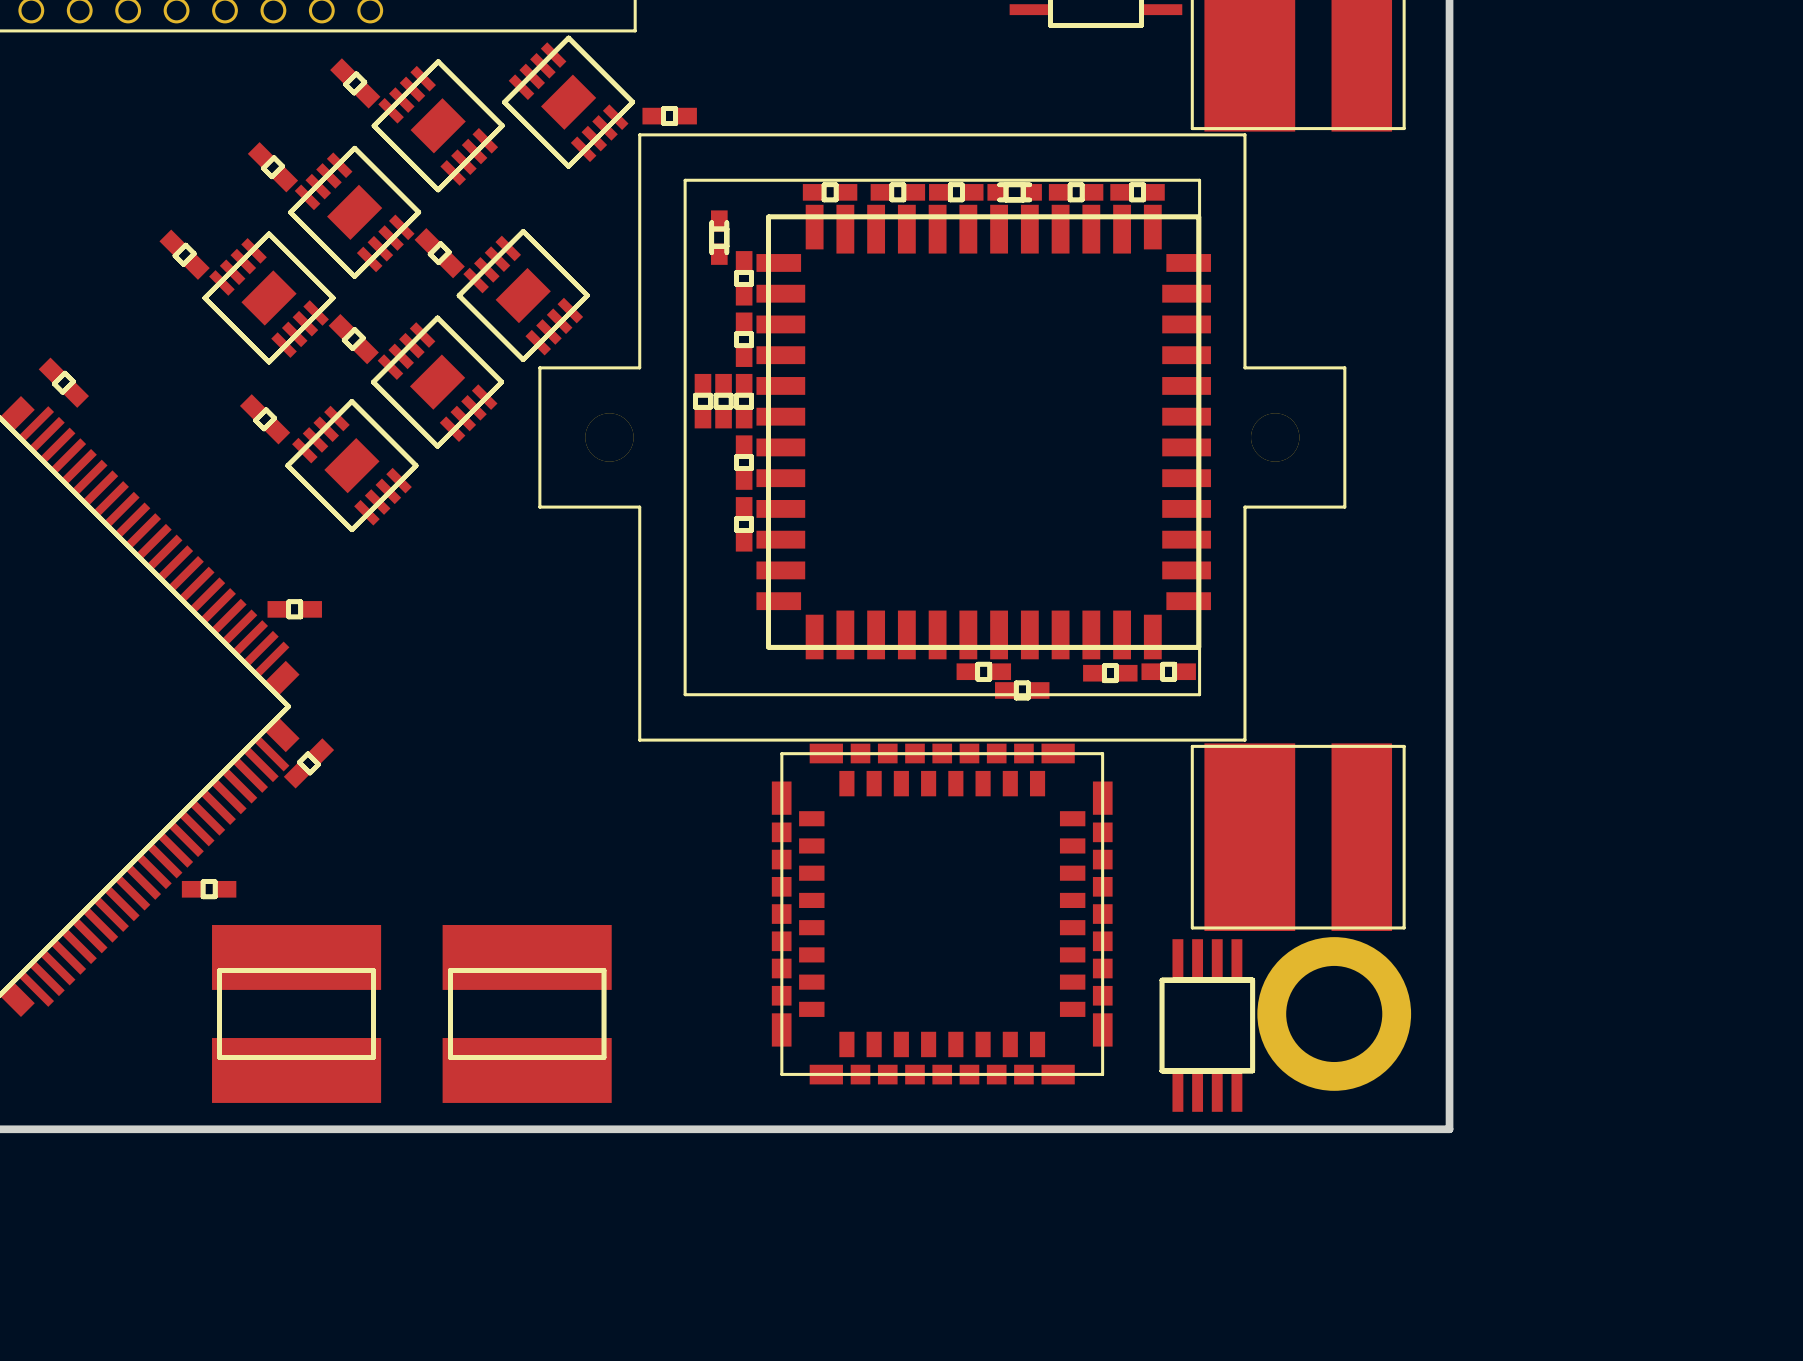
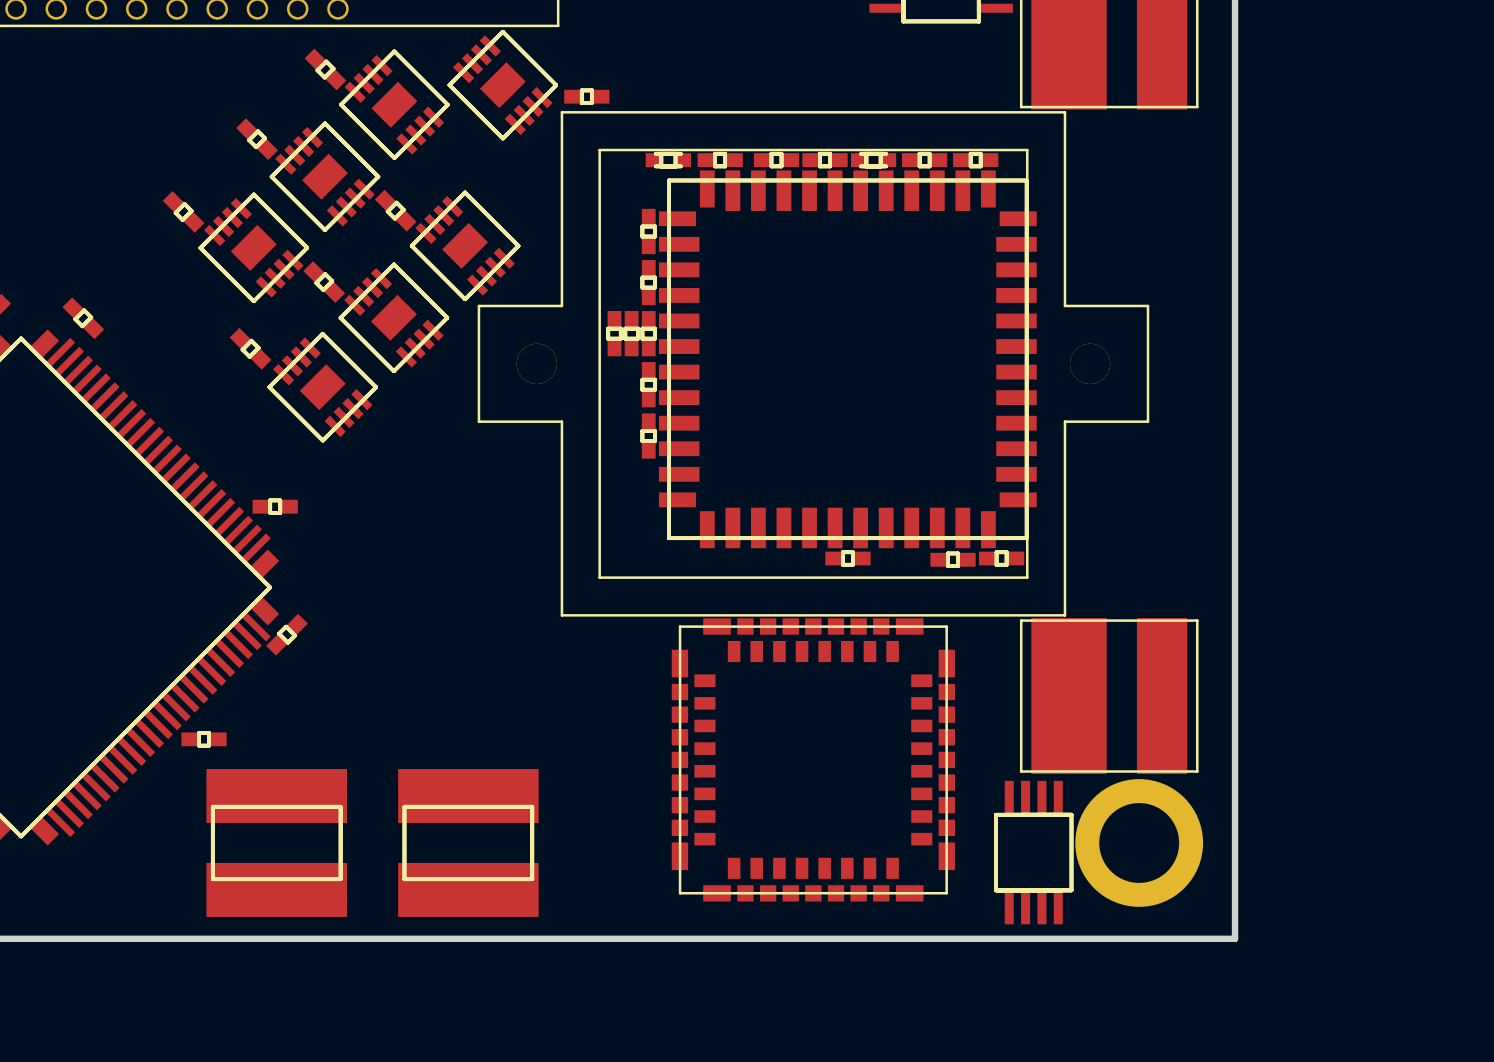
part rotation: 0° (719, 237) -> 90° clockwise (668, 160)
part position: (719, 237) -> (668, 160)
part: (1022, 690) -> none

